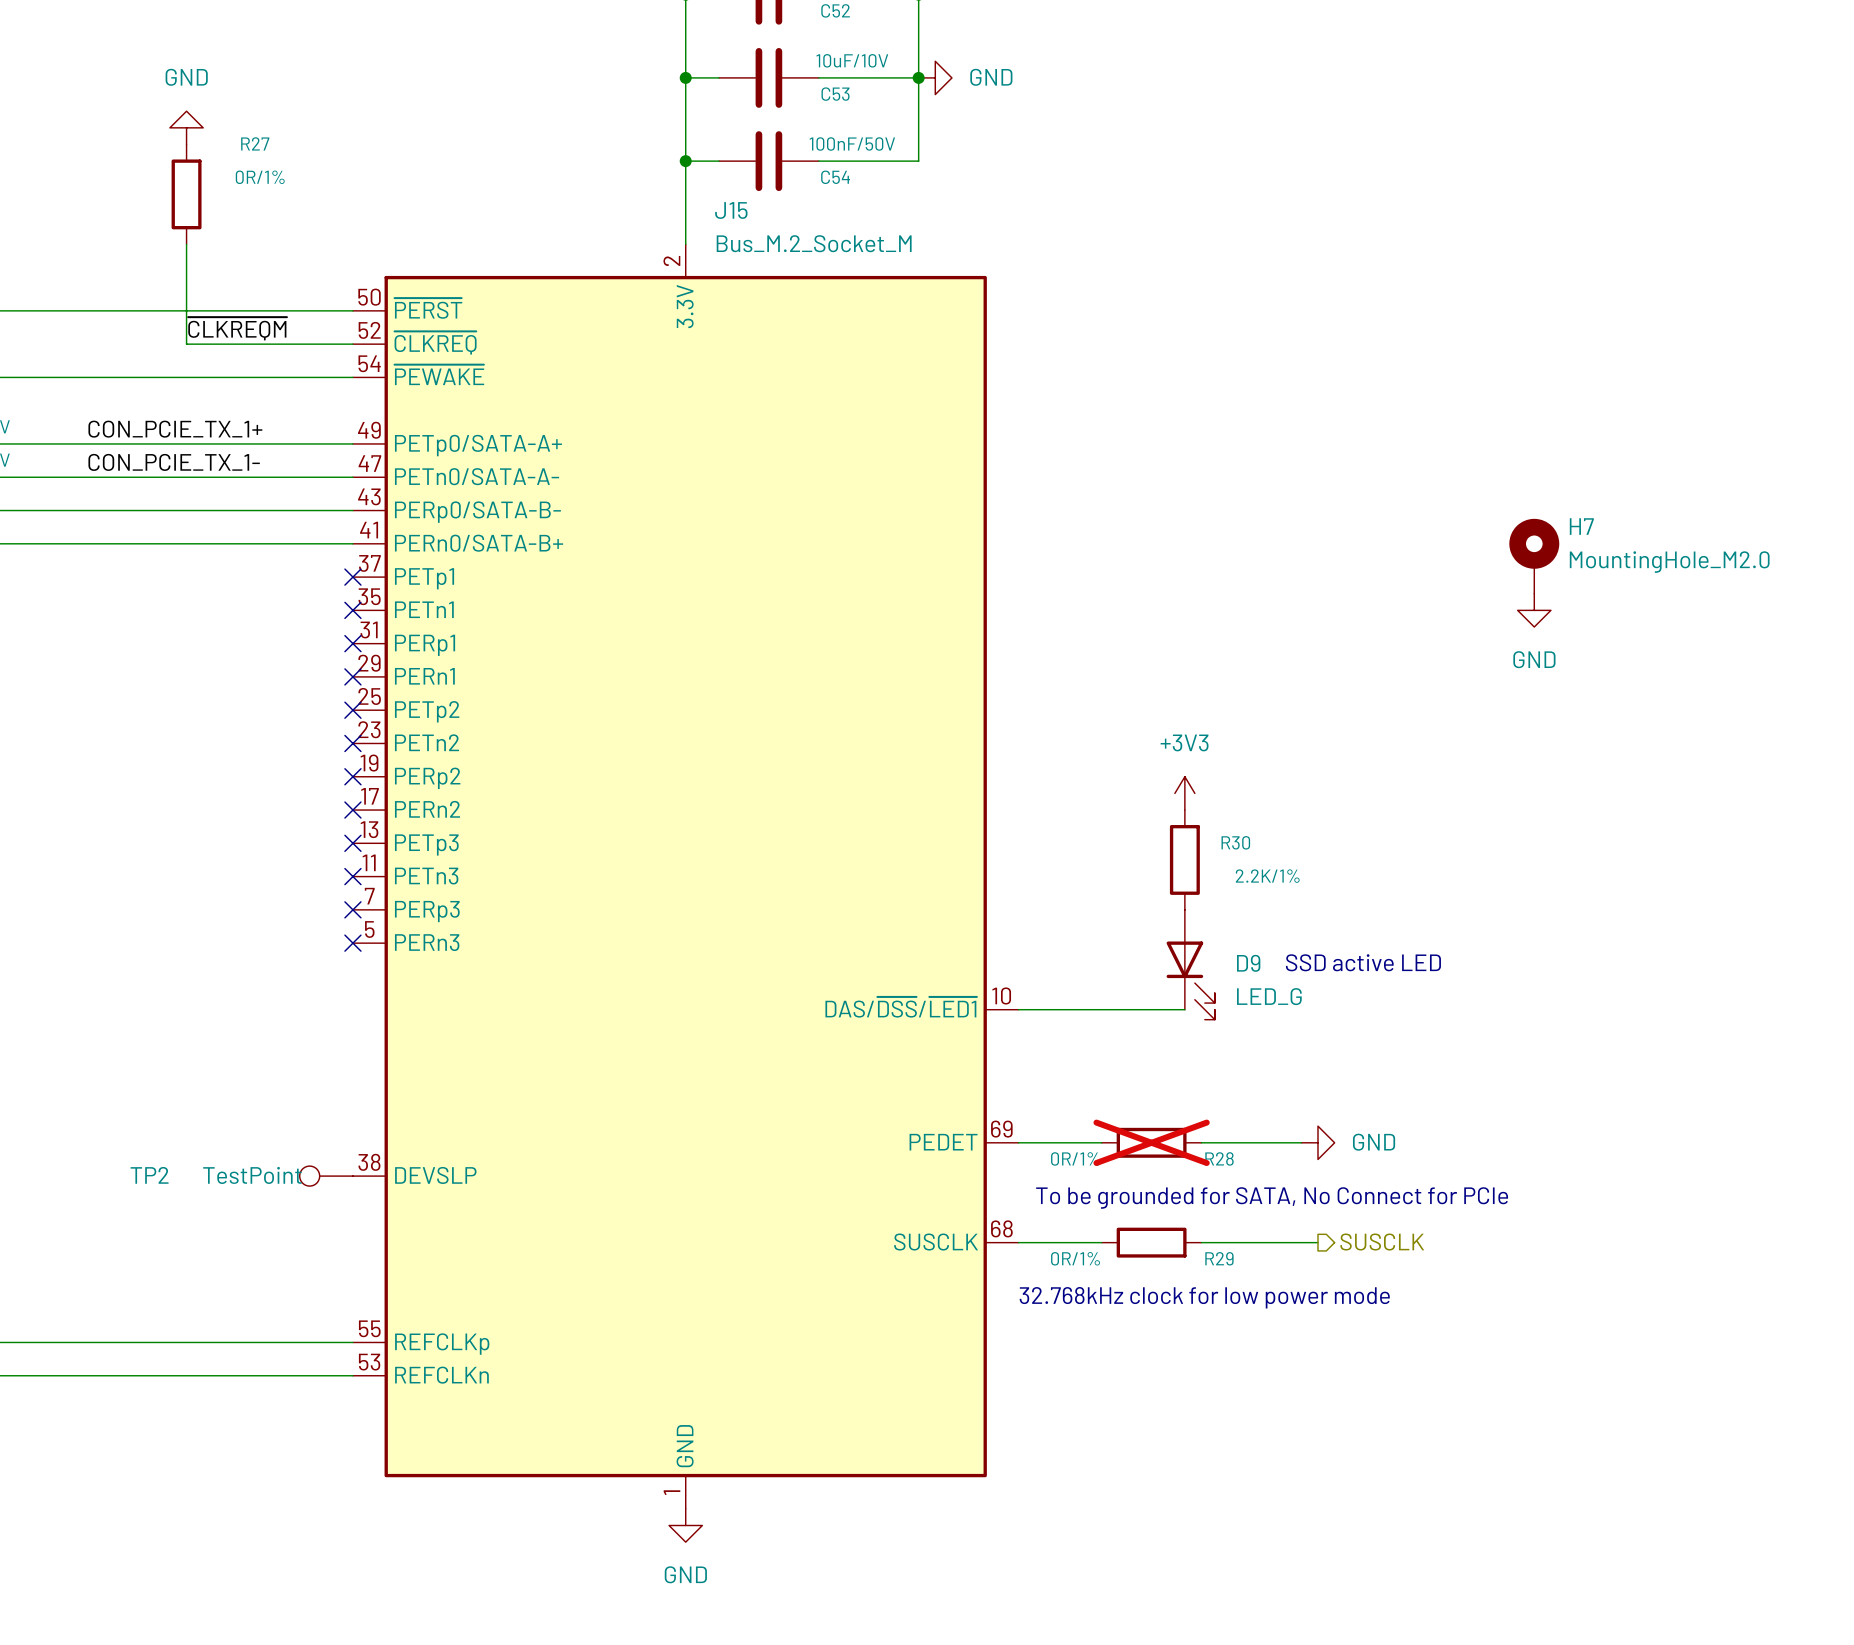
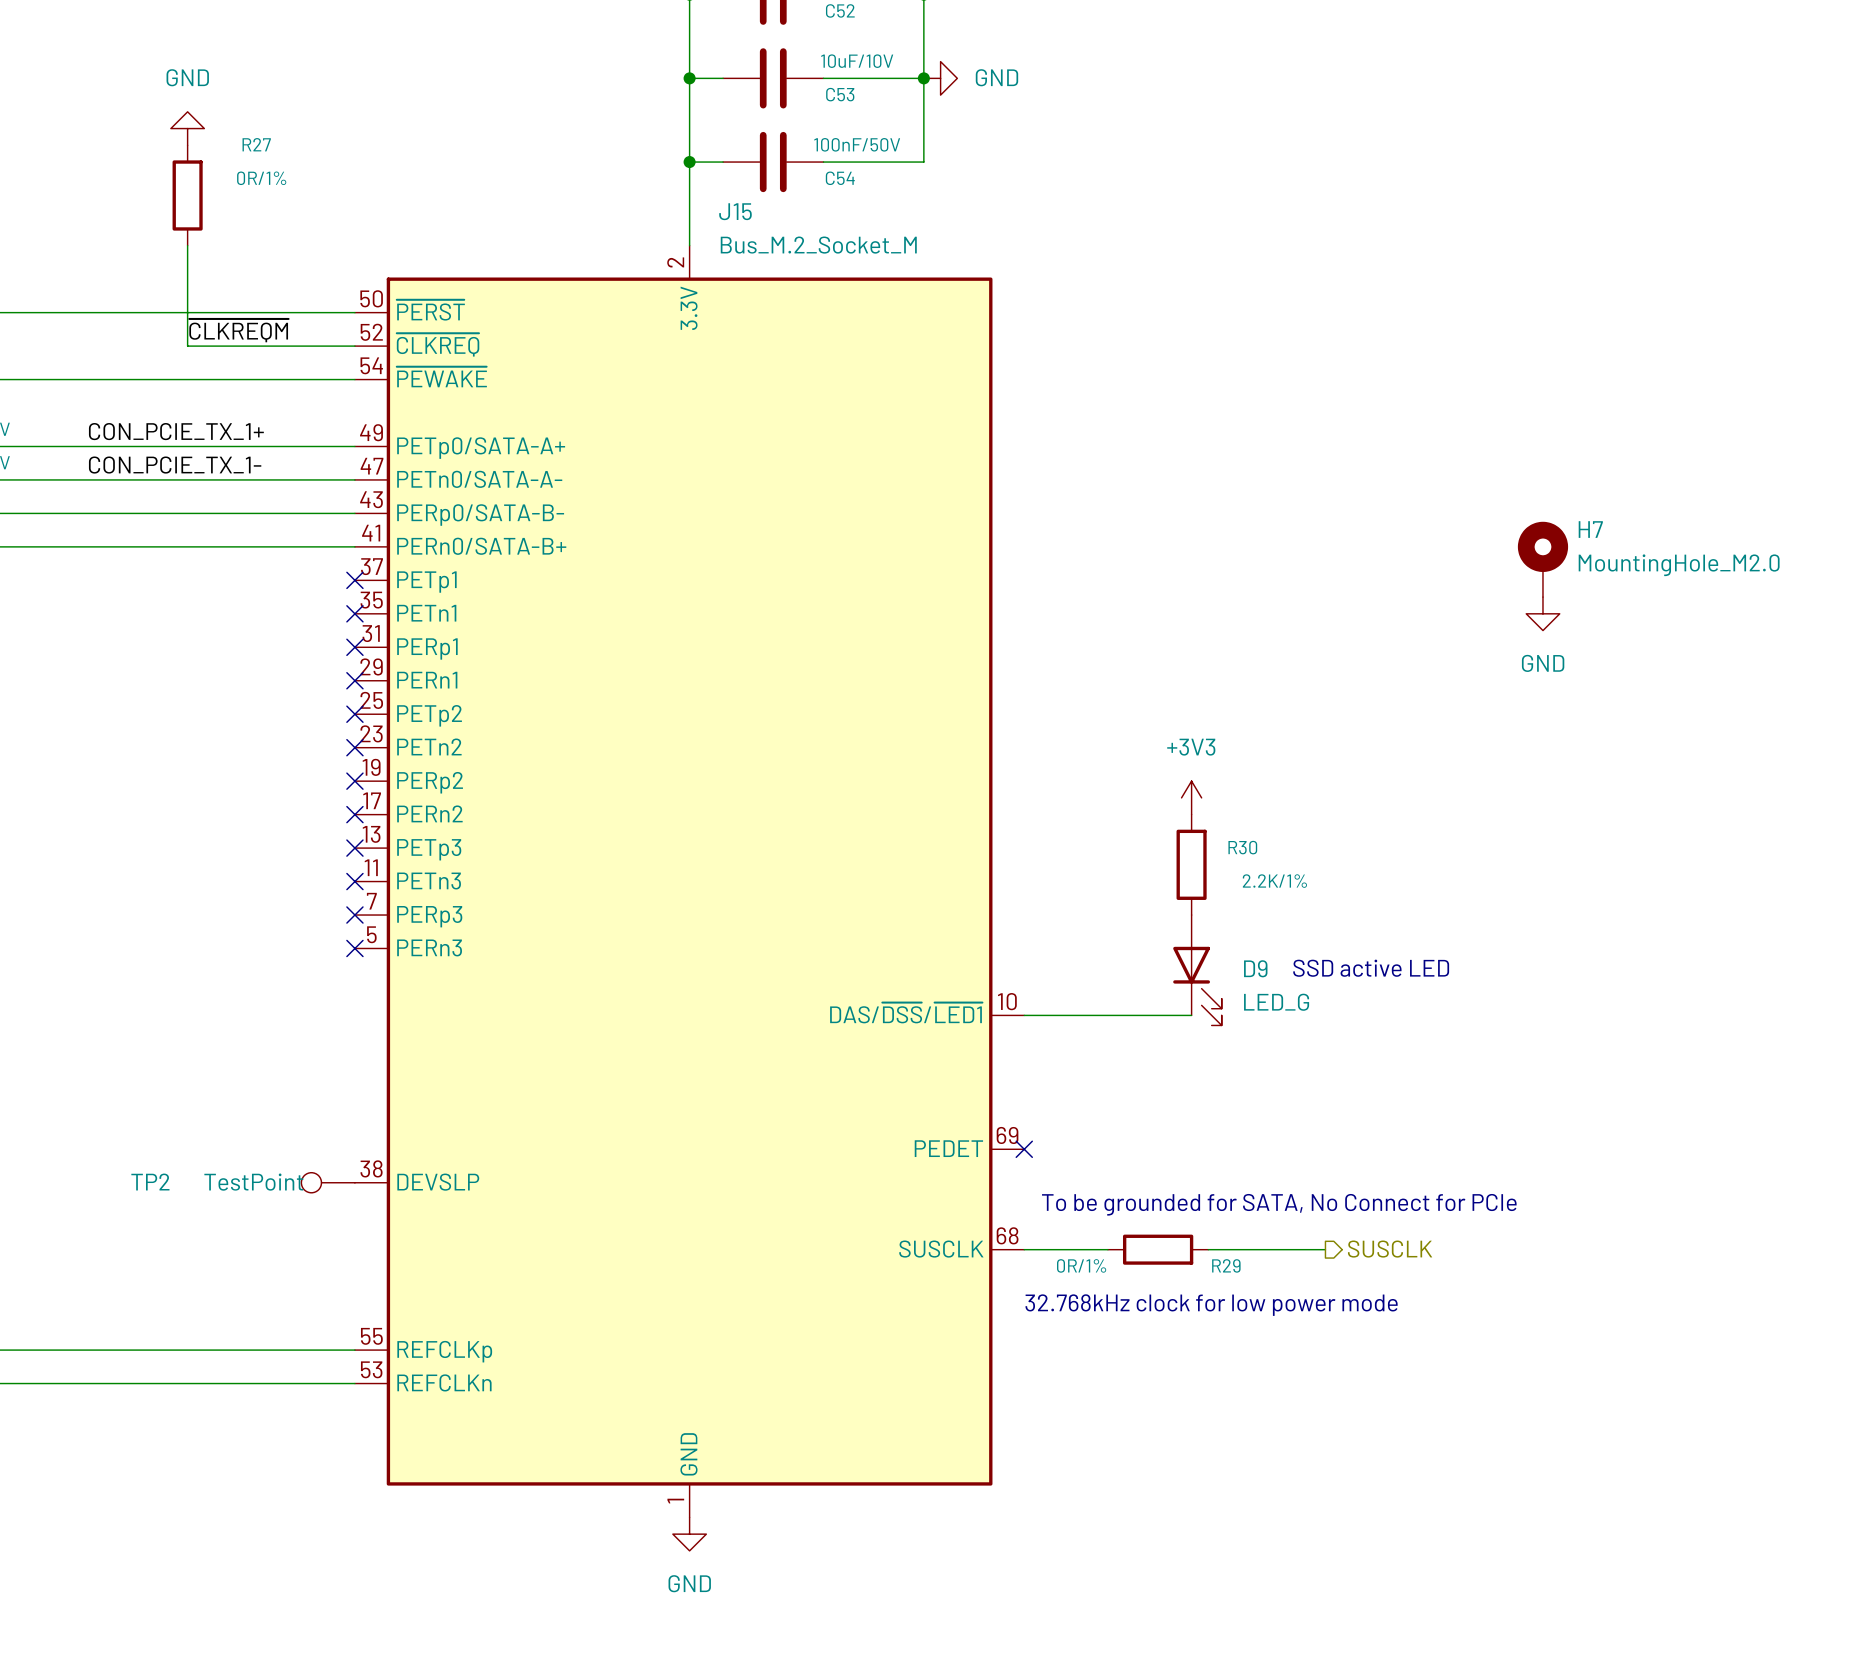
wire: (1018, 1142) (1101, 1142) -> none
no-connect mark: none -> (1024, 1149)
R28: 0R/1% (1151, 1142) -> none
wire: (1201, 1142) (1301, 1142) -> none
power symbol: GND (1317, 1142) -> none

